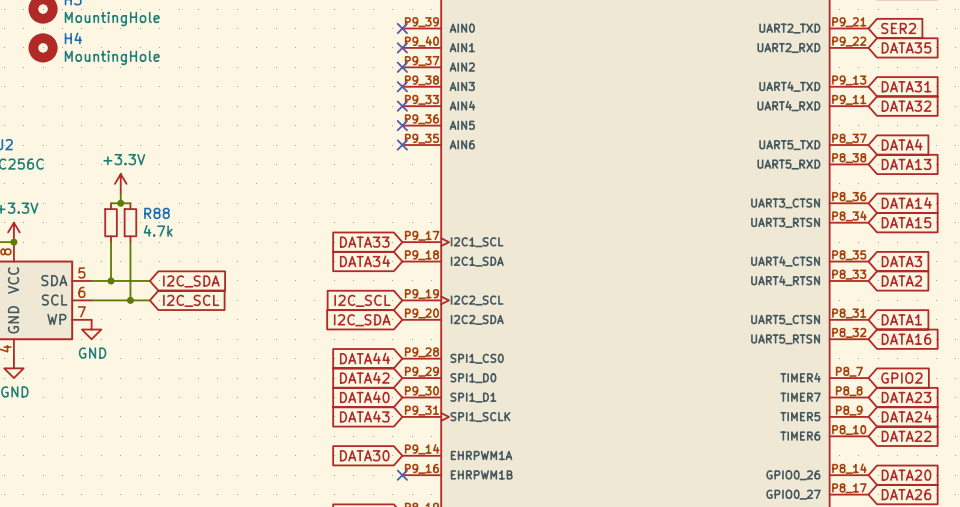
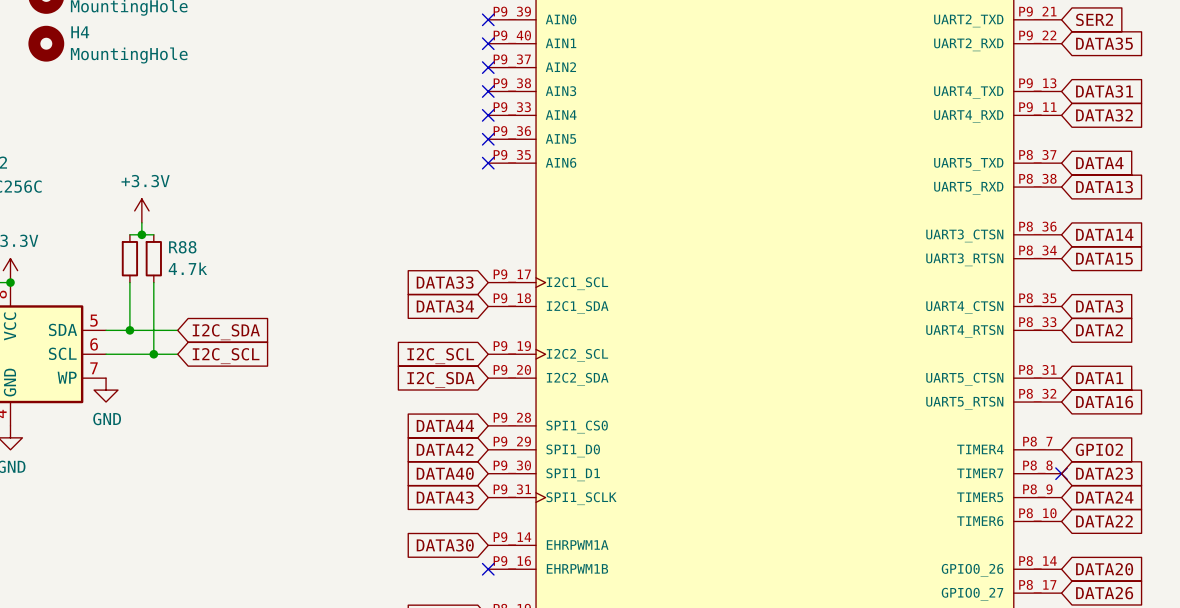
no-connect mark: none -> (1061, 473)

